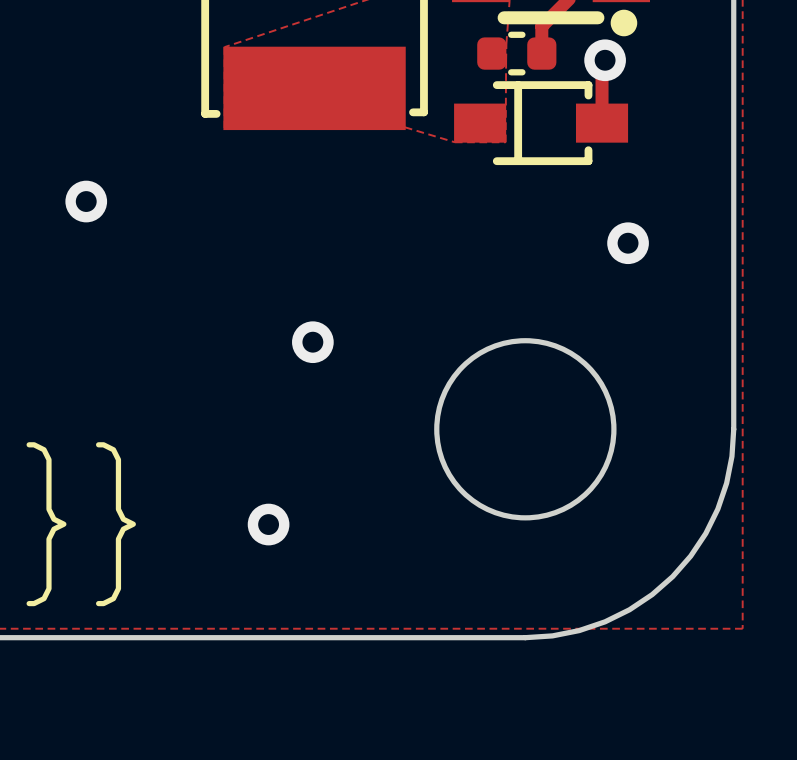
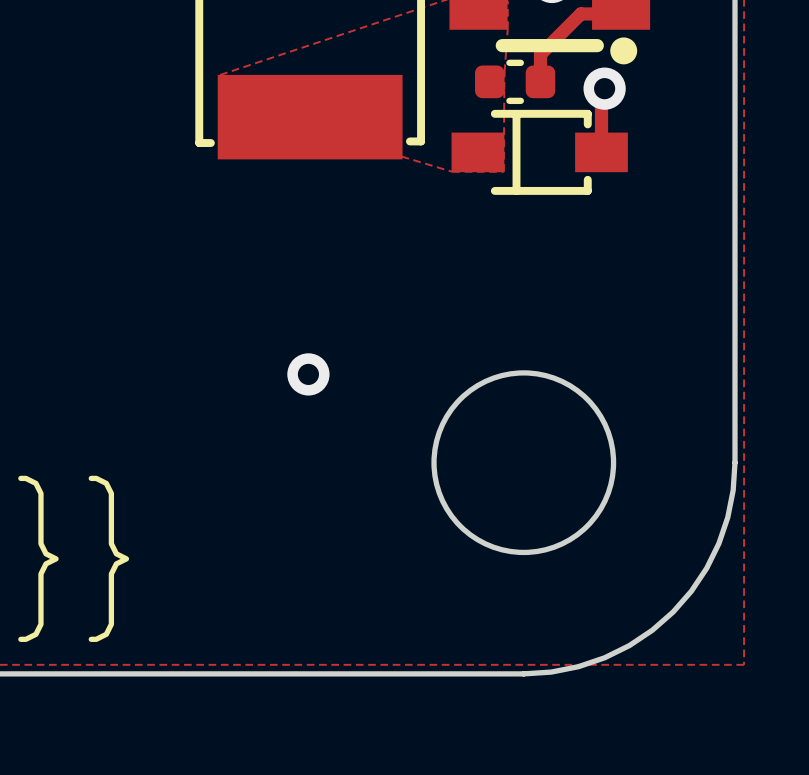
via: (86, 201) -> none
via: (628, 243) -> none
via: (268, 524) -> none

